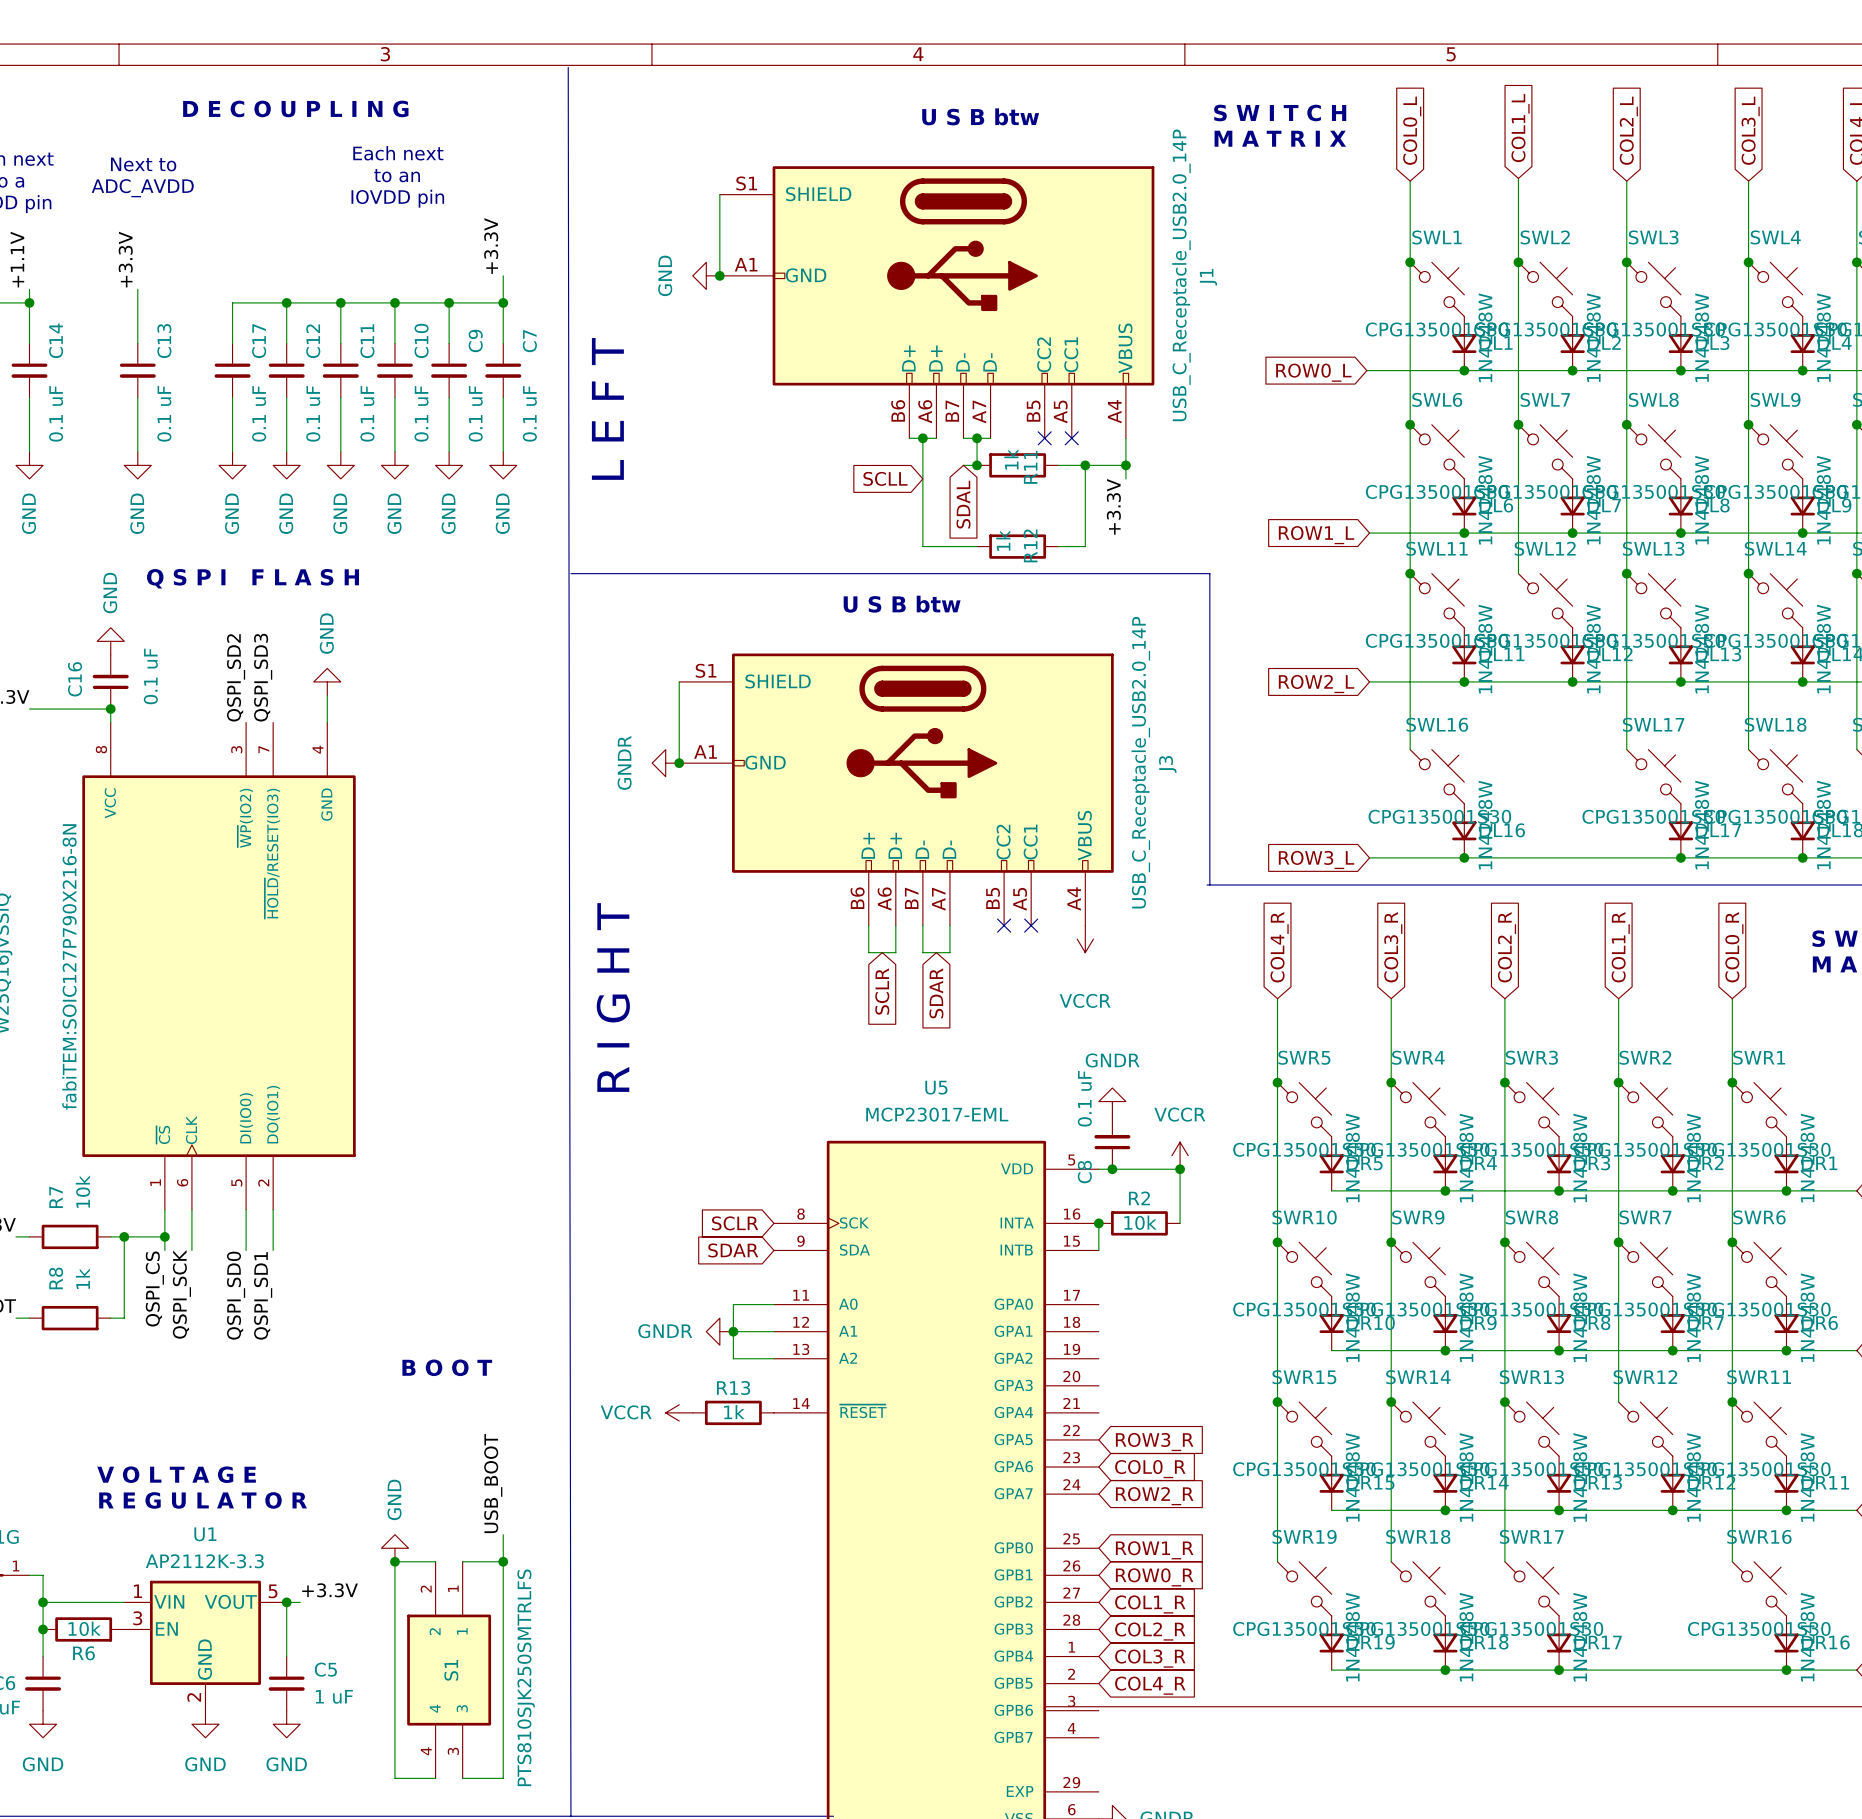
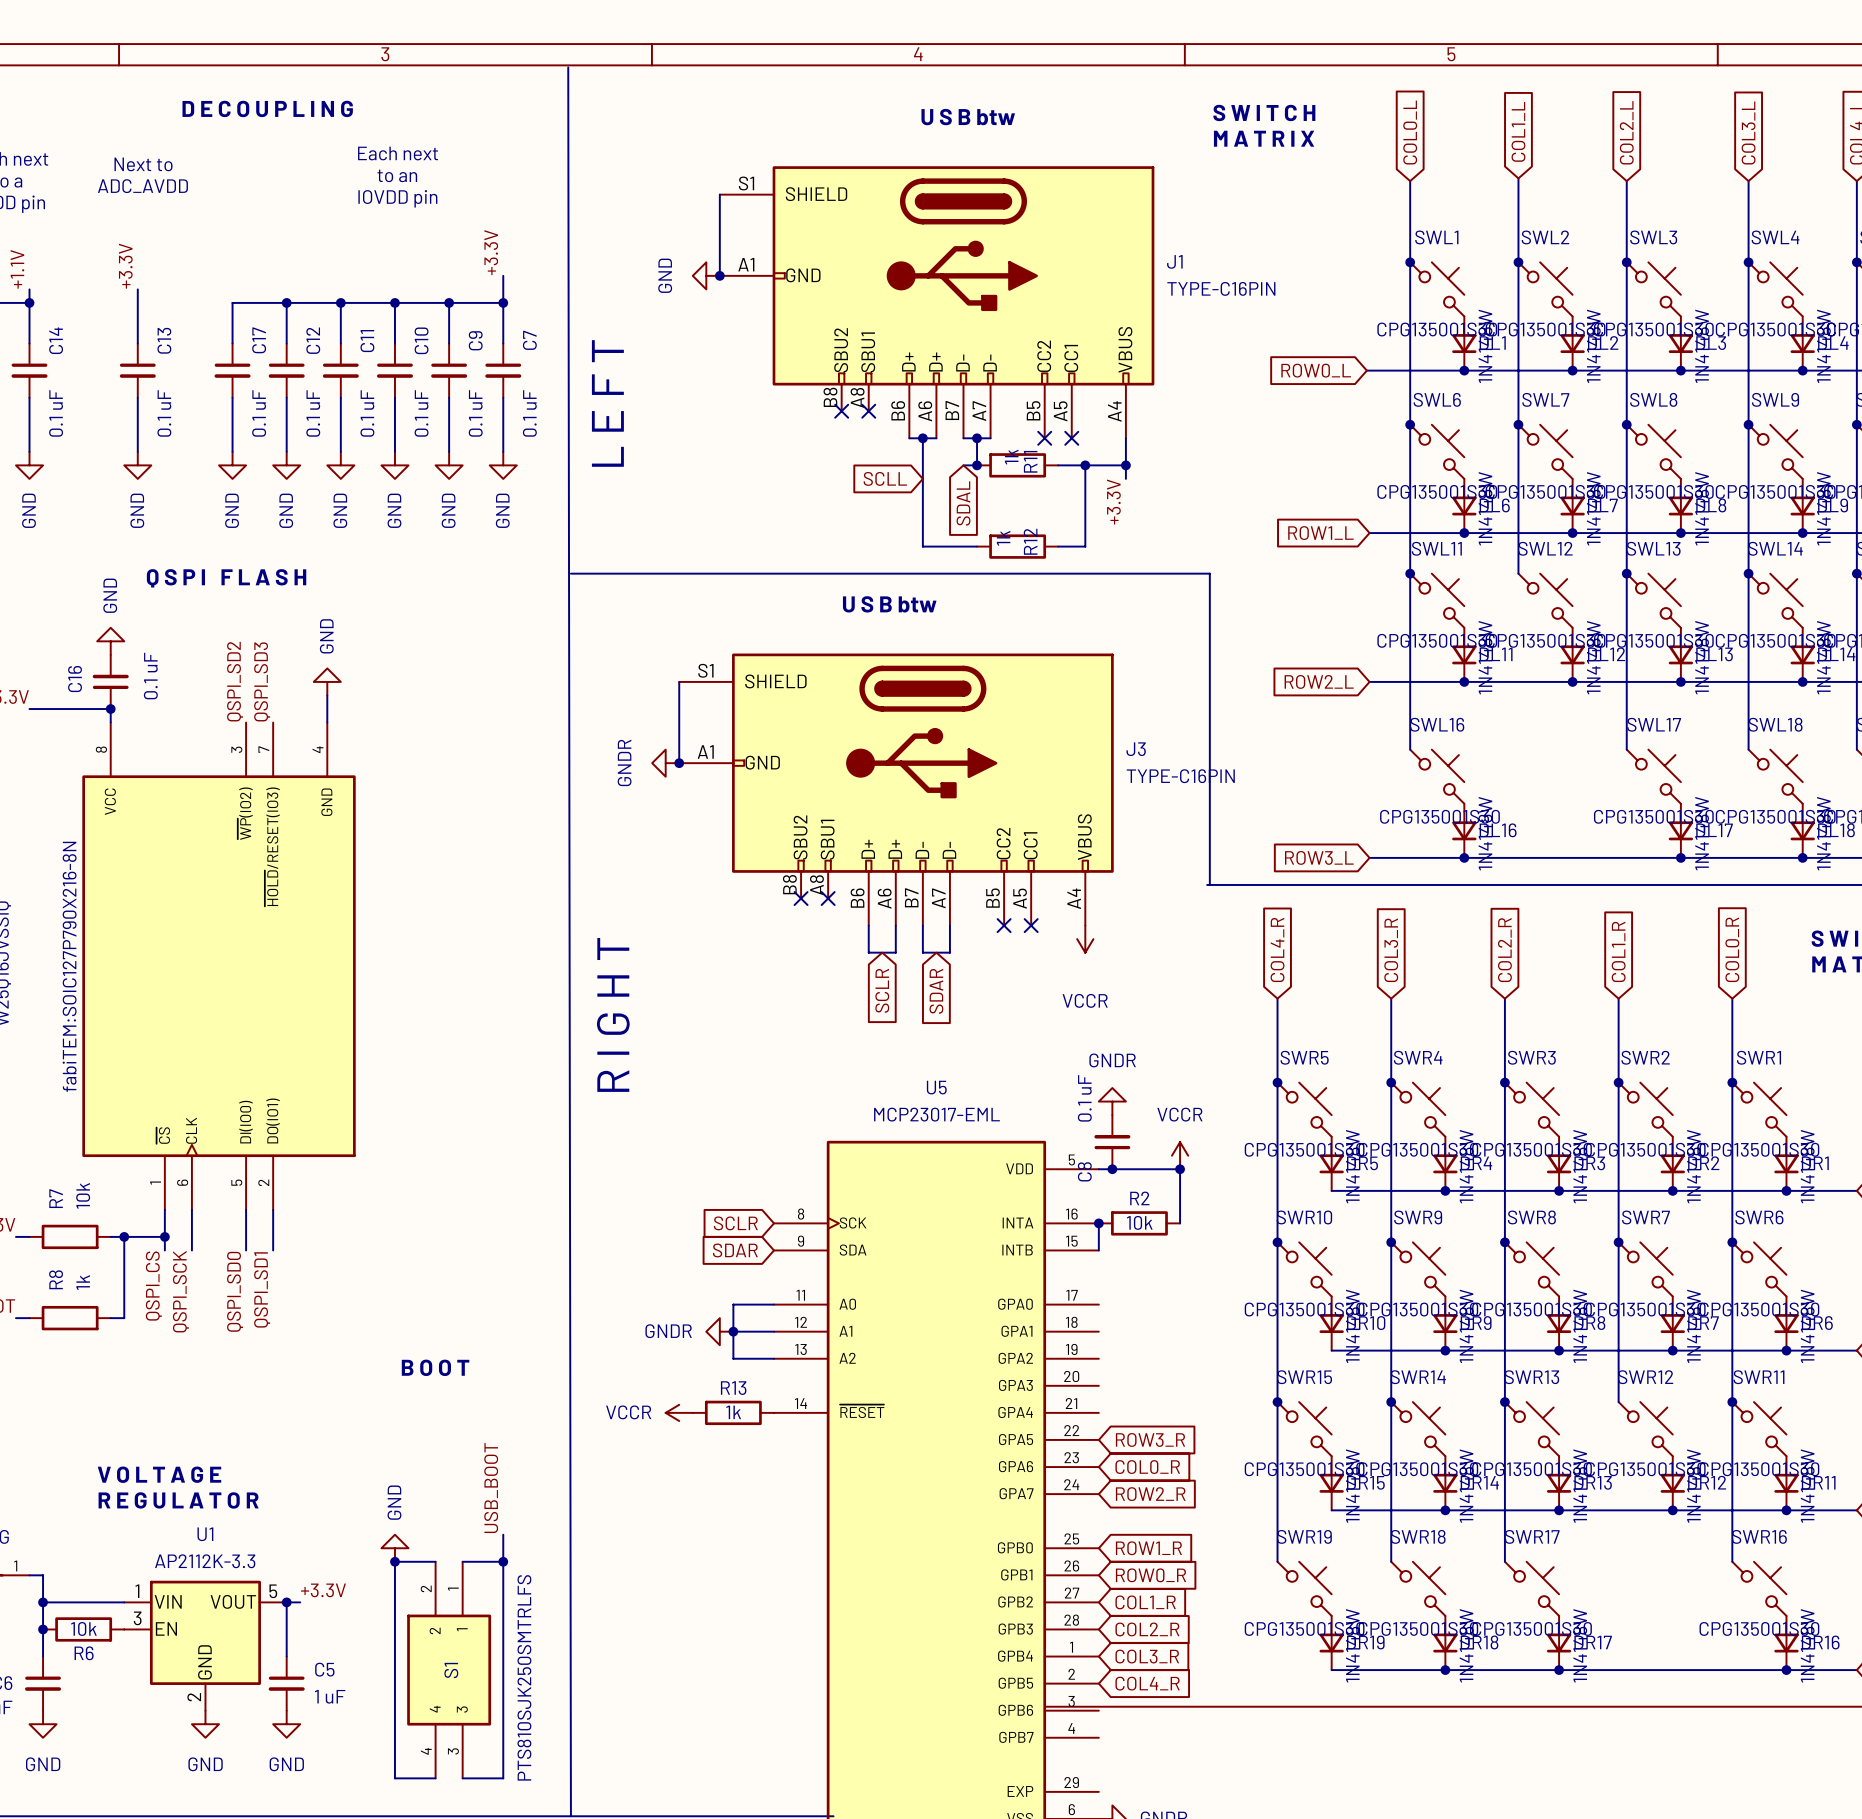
J1 symbol: [719, 166, 1155, 439] -> [719, 166, 1155, 439]
J1 value: USB_C_Receptacle_USB2.0_14P (1181, 275) -> TYPE-C16PIN (1221, 288)
J1 name position: J1 (1208, 277) -> J1 (1174, 261)
no-connect mark: none -> (841, 411)
no-connect mark: none -> (868, 411)
J3 symbol: [679, 653, 1114, 926] -> [679, 653, 1114, 926]
J3 value: USB_C_Receptacle_USB2.0_14P (1140, 762) -> TYPE-C16PIN (1180, 776)
J3 name position: J3 (1167, 764) -> J3 (1136, 749)
no-connect mark: none -> (801, 898)
no-connect mark: none -> (828, 898)

